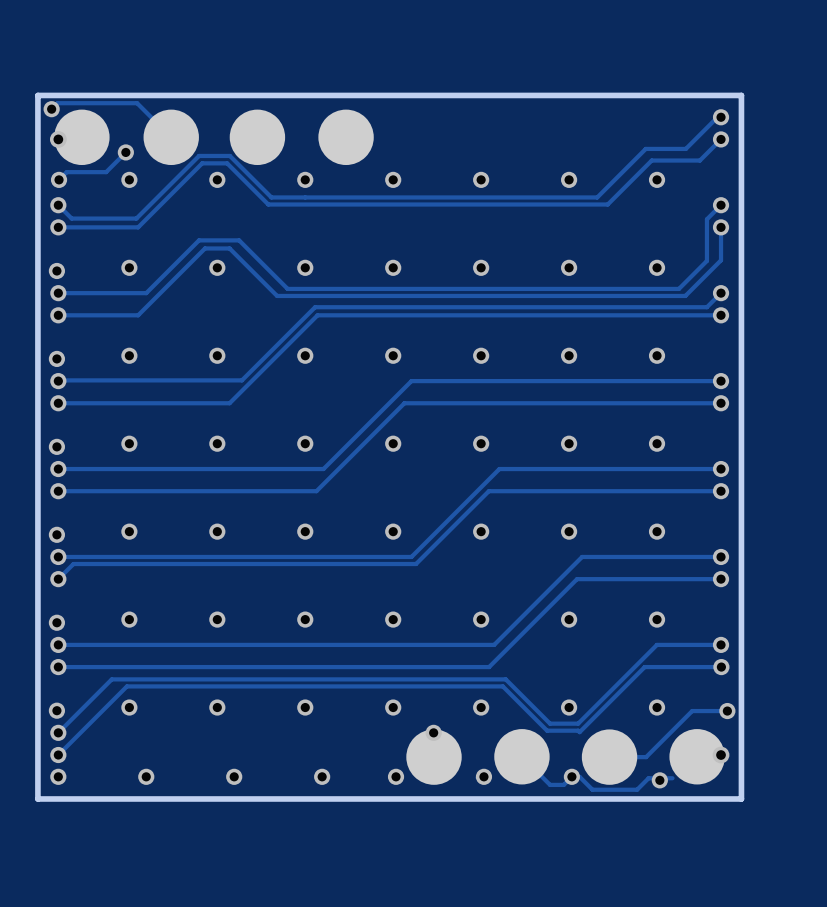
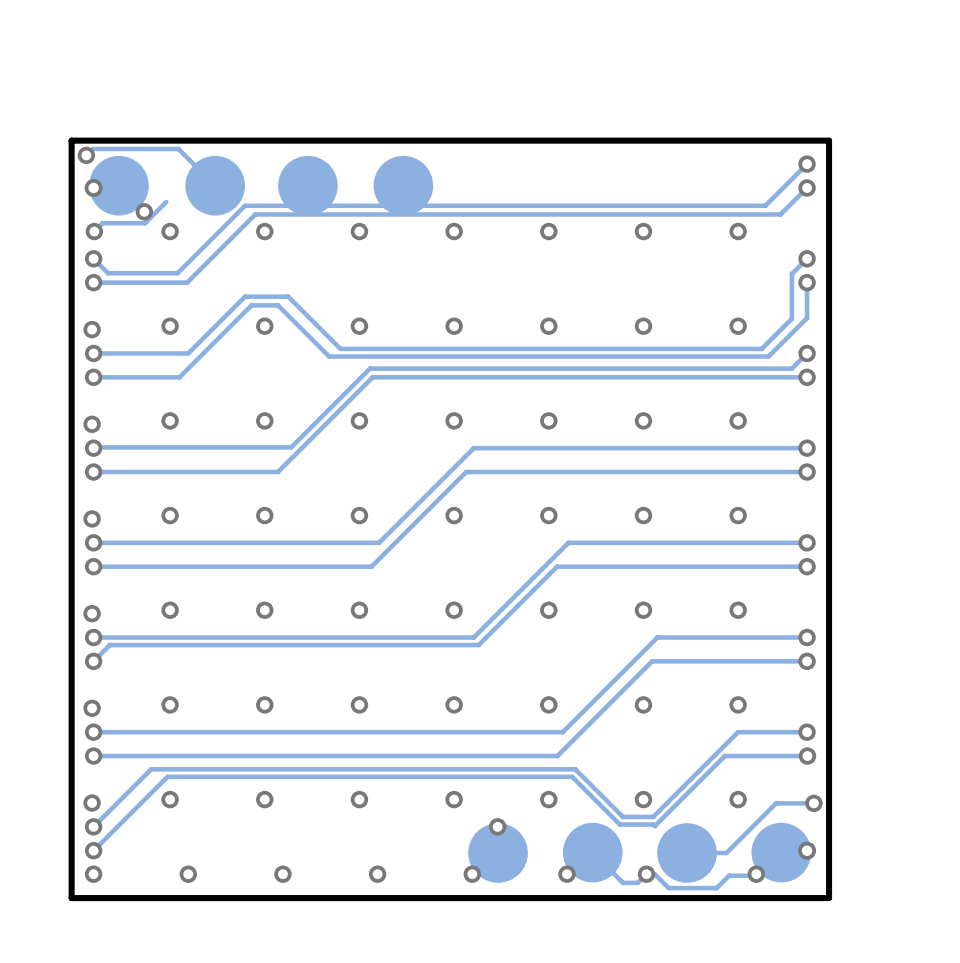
track: (721, 117) (717, 117) (685, 148) (645, 148) (597, 197) (271, 197) (229, 155) -> (807, 164) (765, 205) (278, 205)
via position: (125, 152) -> (144, 211)
track: (699, 160) (651, 160) (607, 204) (268, 204) (227, 163) (202, 163) (138, 227) -> (784, 210) (780, 214) (255, 214) (187, 282) (179, 282)
via position: (396, 776) -> (472, 874)
via position: (483, 776) -> (566, 874)
via position: (659, 780) -> (756, 874)

